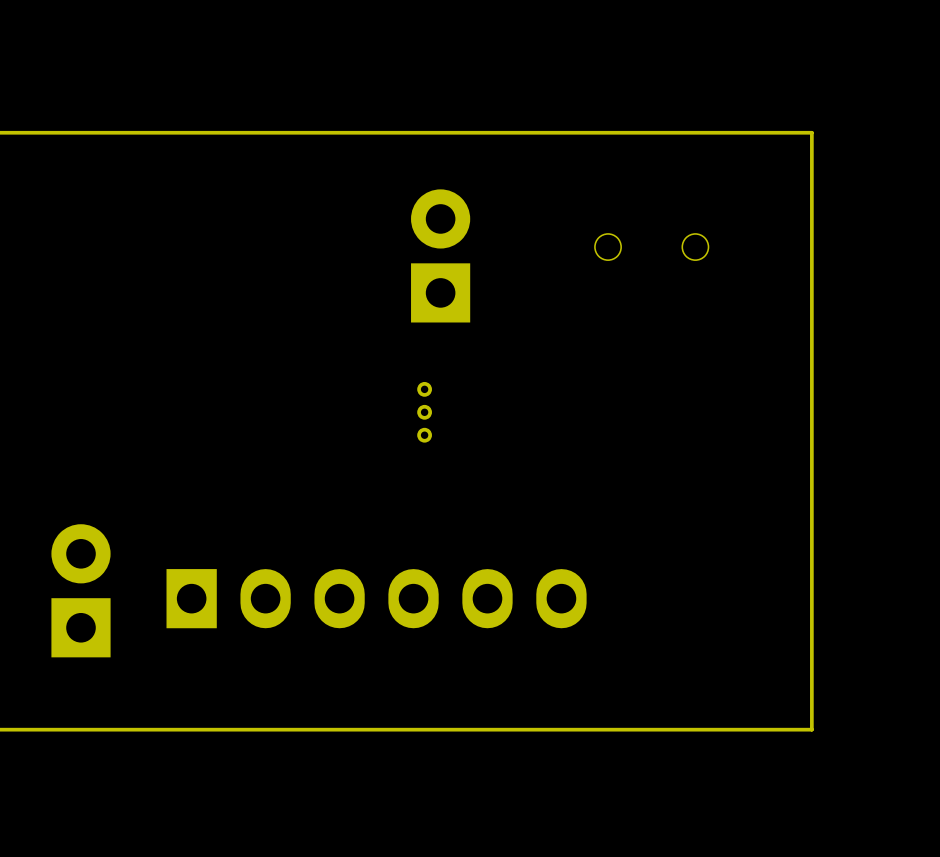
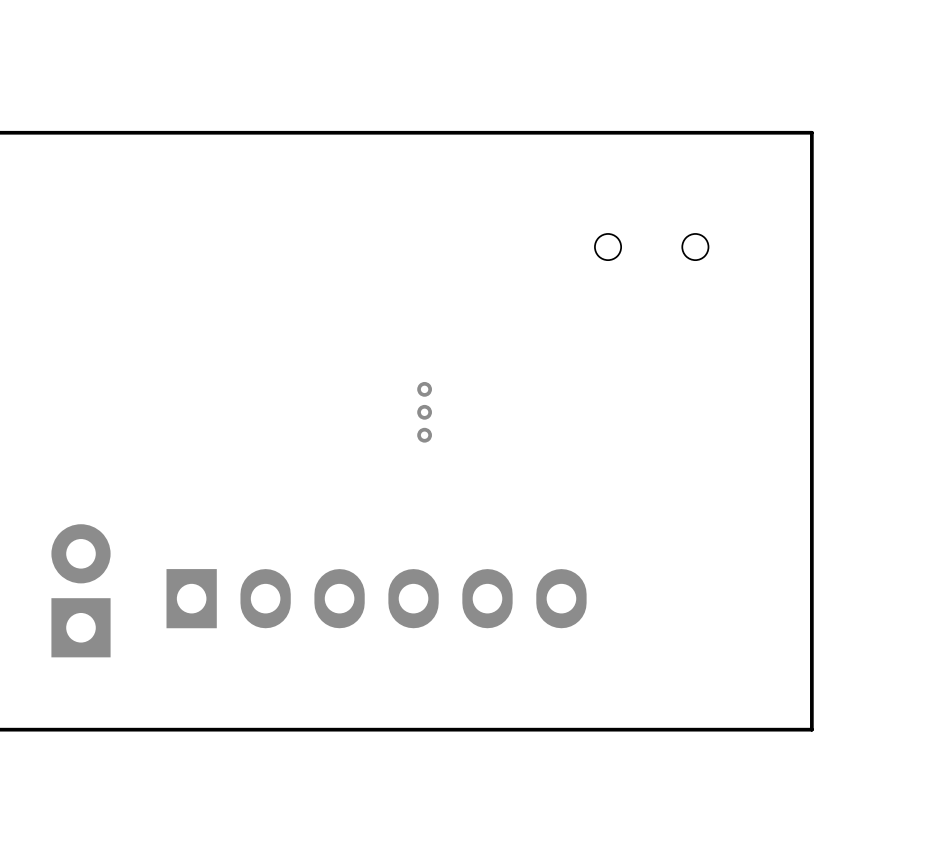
part: (440, 255) -> none

